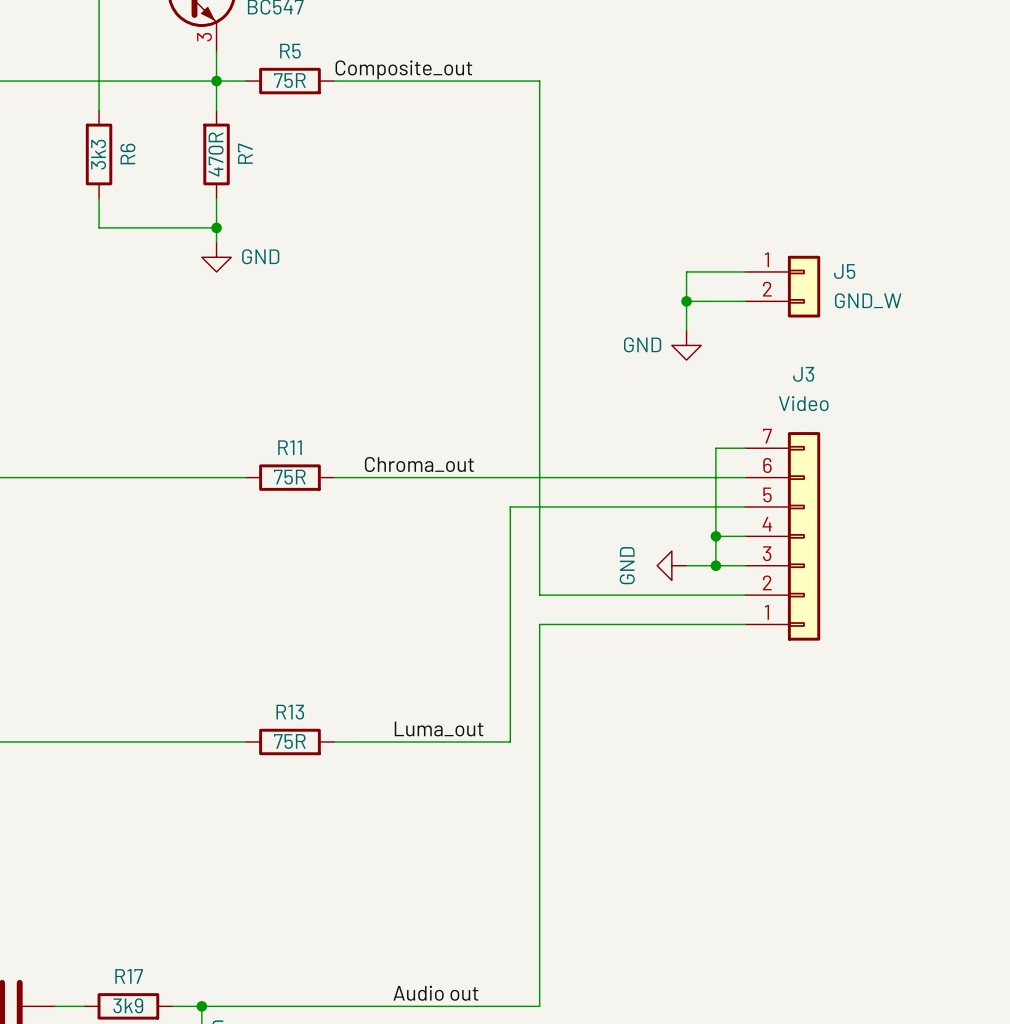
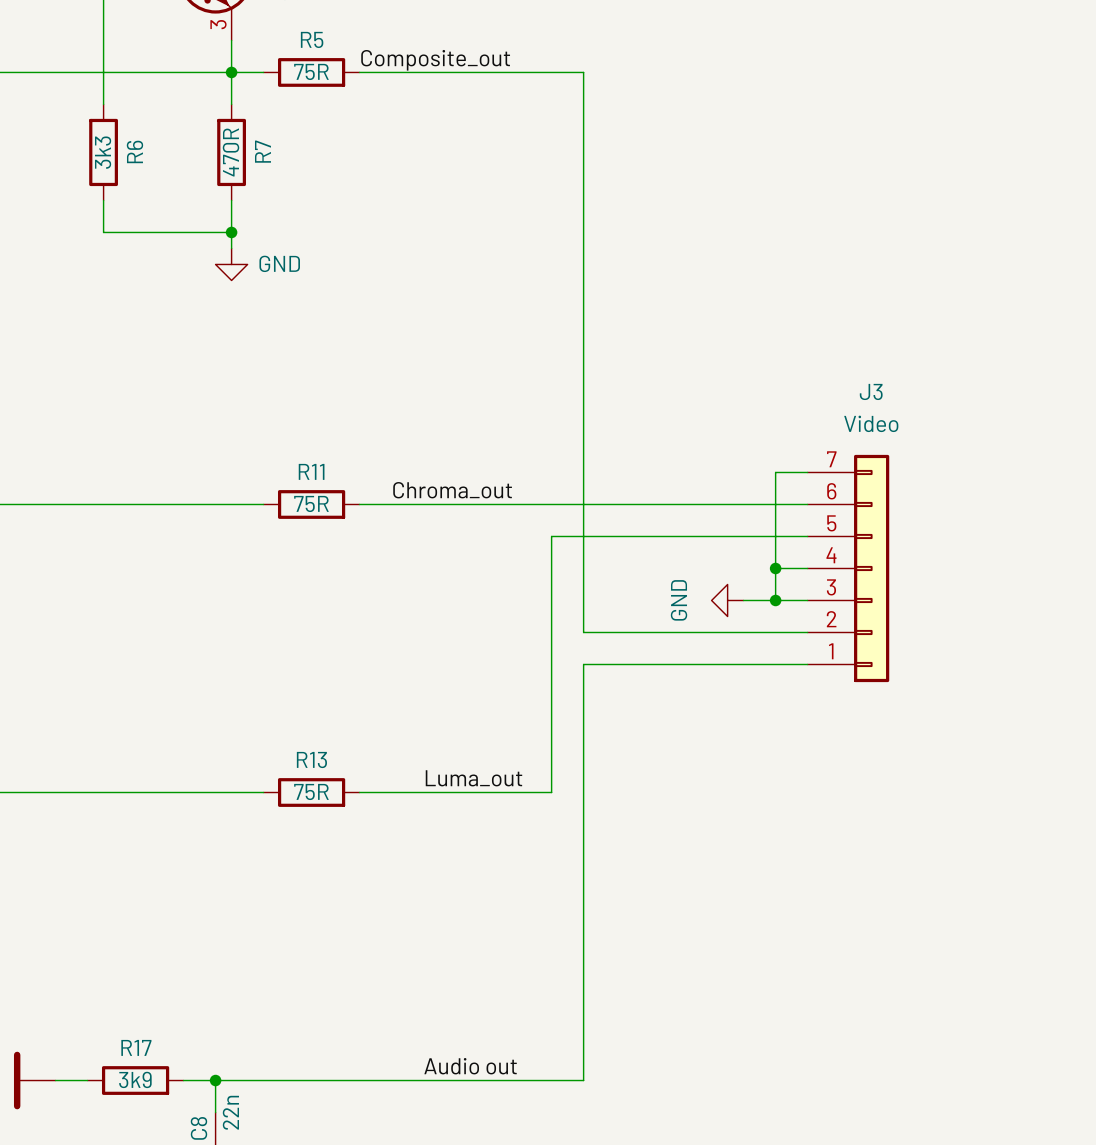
wire: (745, 271) (686, 271) (686, 330) -> none
J5: GND_W (782, 286) -> none
wire: (686, 301) (745, 301) -> none
junction: (686, 301) -> none
power symbol: GND (686, 345) -> none

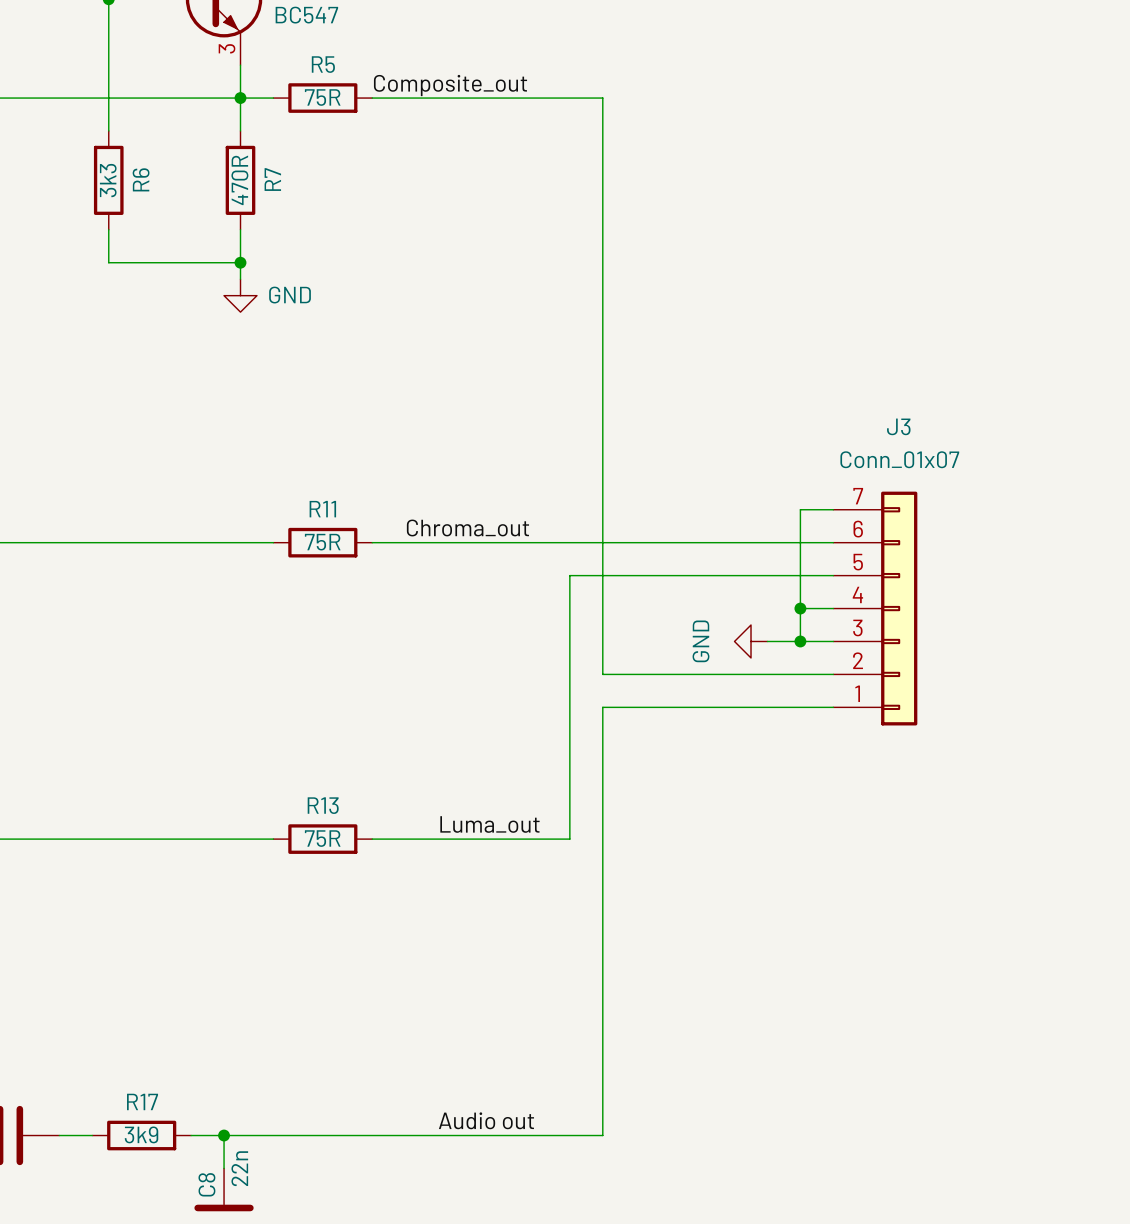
J3 value: Video (871, 423) -> Conn_01x07 (899, 459)

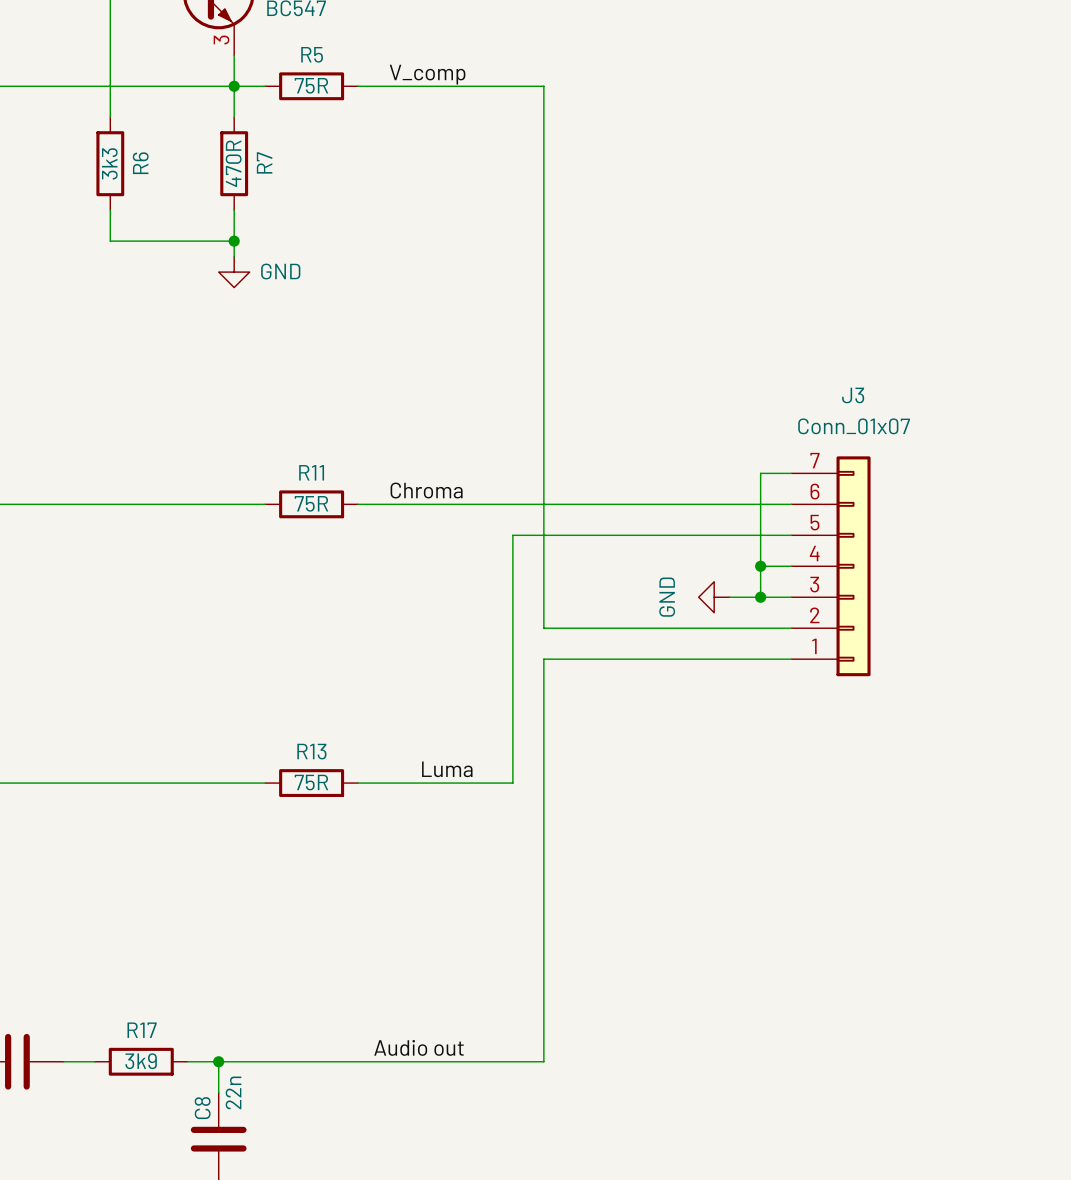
label: none -> V_comp (427, 74)
label: Composite_out (450, 85) -> none
wire: (569, 98) (602, 98) (602, 674) -> (543, 86) (543, 535) (512, 535) (512, 783)
label: Chroma_out (467, 527) -> Chroma (426, 490)
wire: (569, 674) (569, 707) -> (543, 628) (574, 628)
wire: (602, 707) (602, 1135) (569, 1135) -> (543, 783) (543, 1061)
label: Luma_out (489, 824) -> Luma (447, 769)
wire: (536, 839) (569, 839) -> (543, 659) (574, 659)
label position: Audio out (486, 1120) -> Audio out (418, 1047)

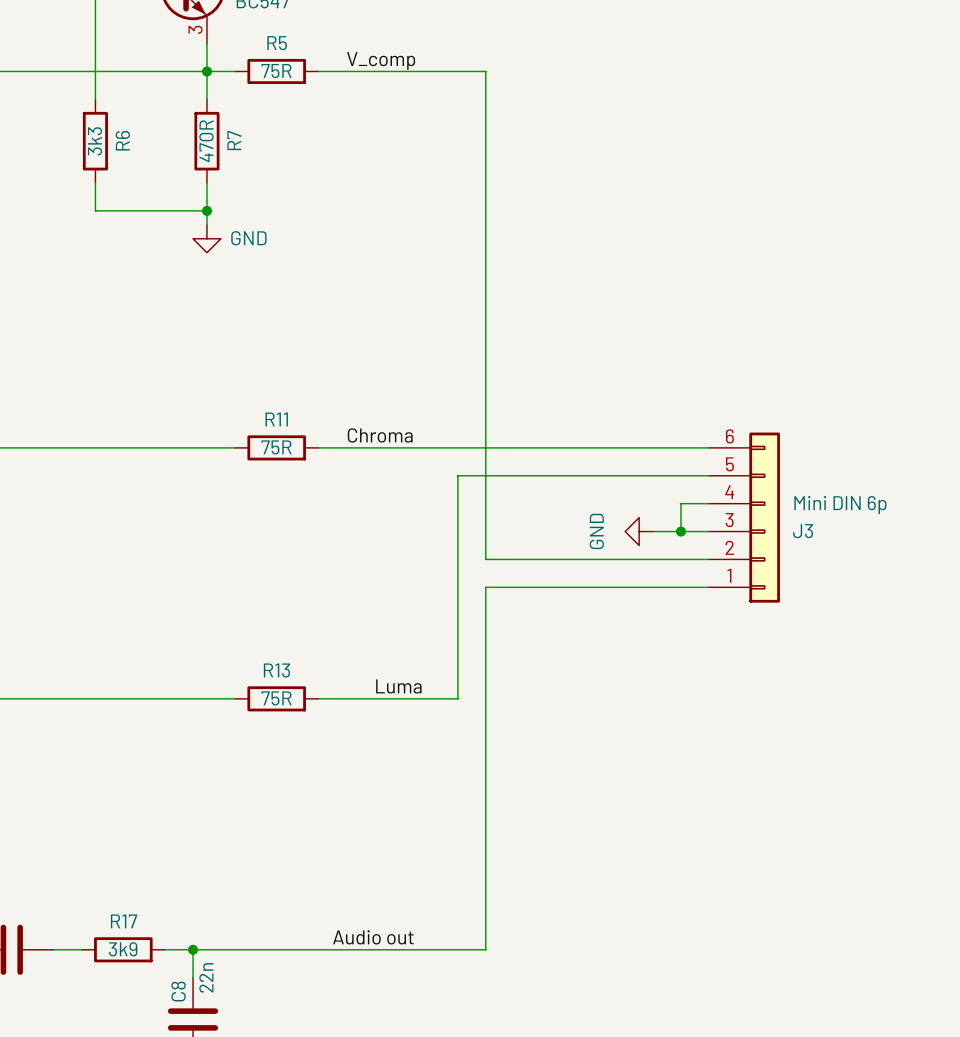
J3 name position: J3 (853, 395) -> J3 (803, 531)
J3 value: Conn_01x07 (854, 426) -> Mini DIN 6p (840, 504)
J3 symbol: [791, 456, 871, 677] -> [708, 432, 780, 603]
wire: (791, 473) (760, 473) (760, 566) -> none
junction: (760, 566) -> none

